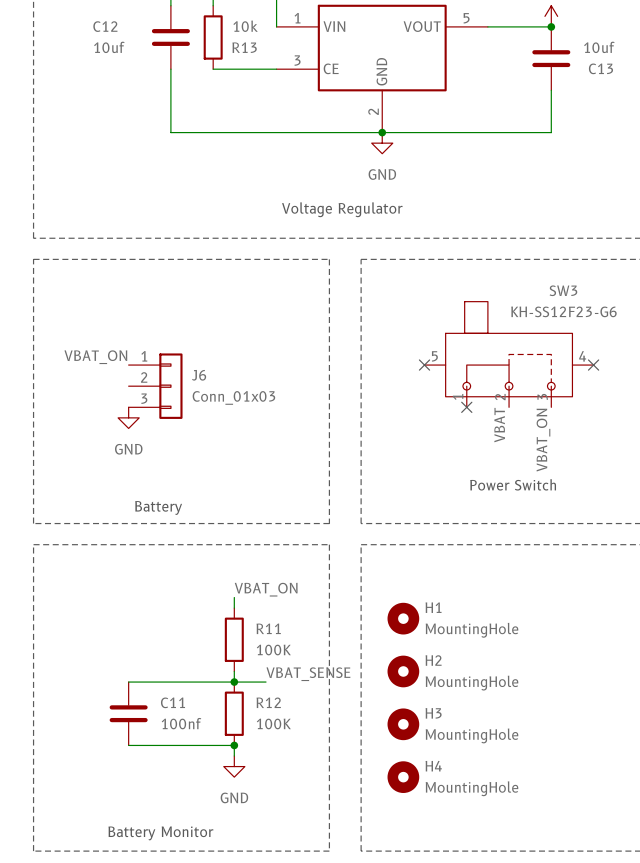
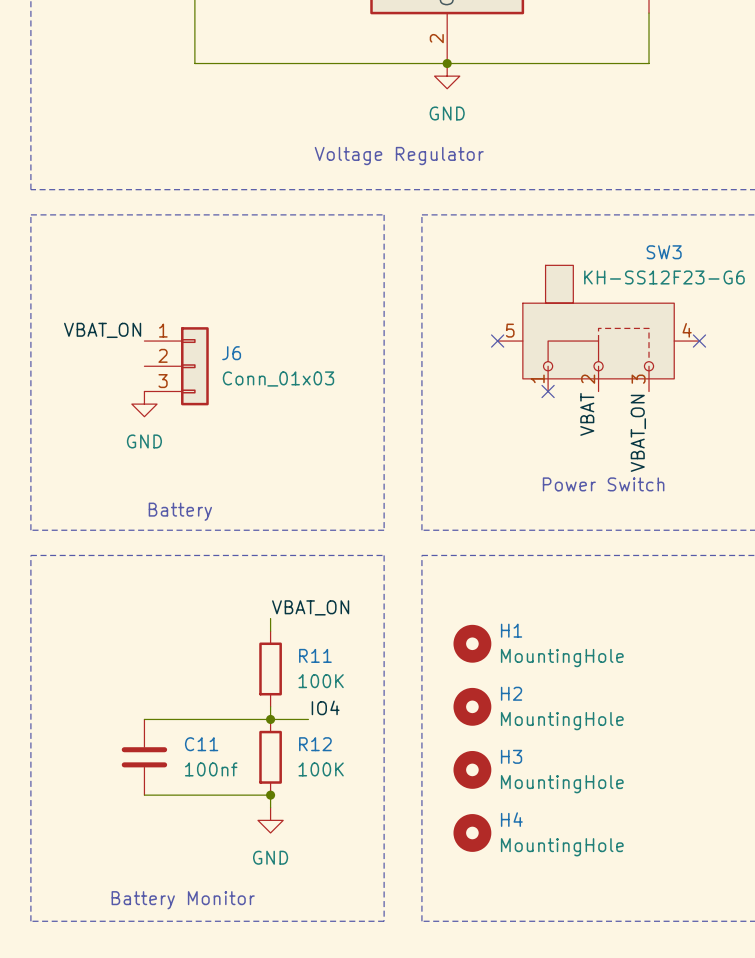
label: VBAT_SENSE (308, 674) -> IO4 (325, 707)

